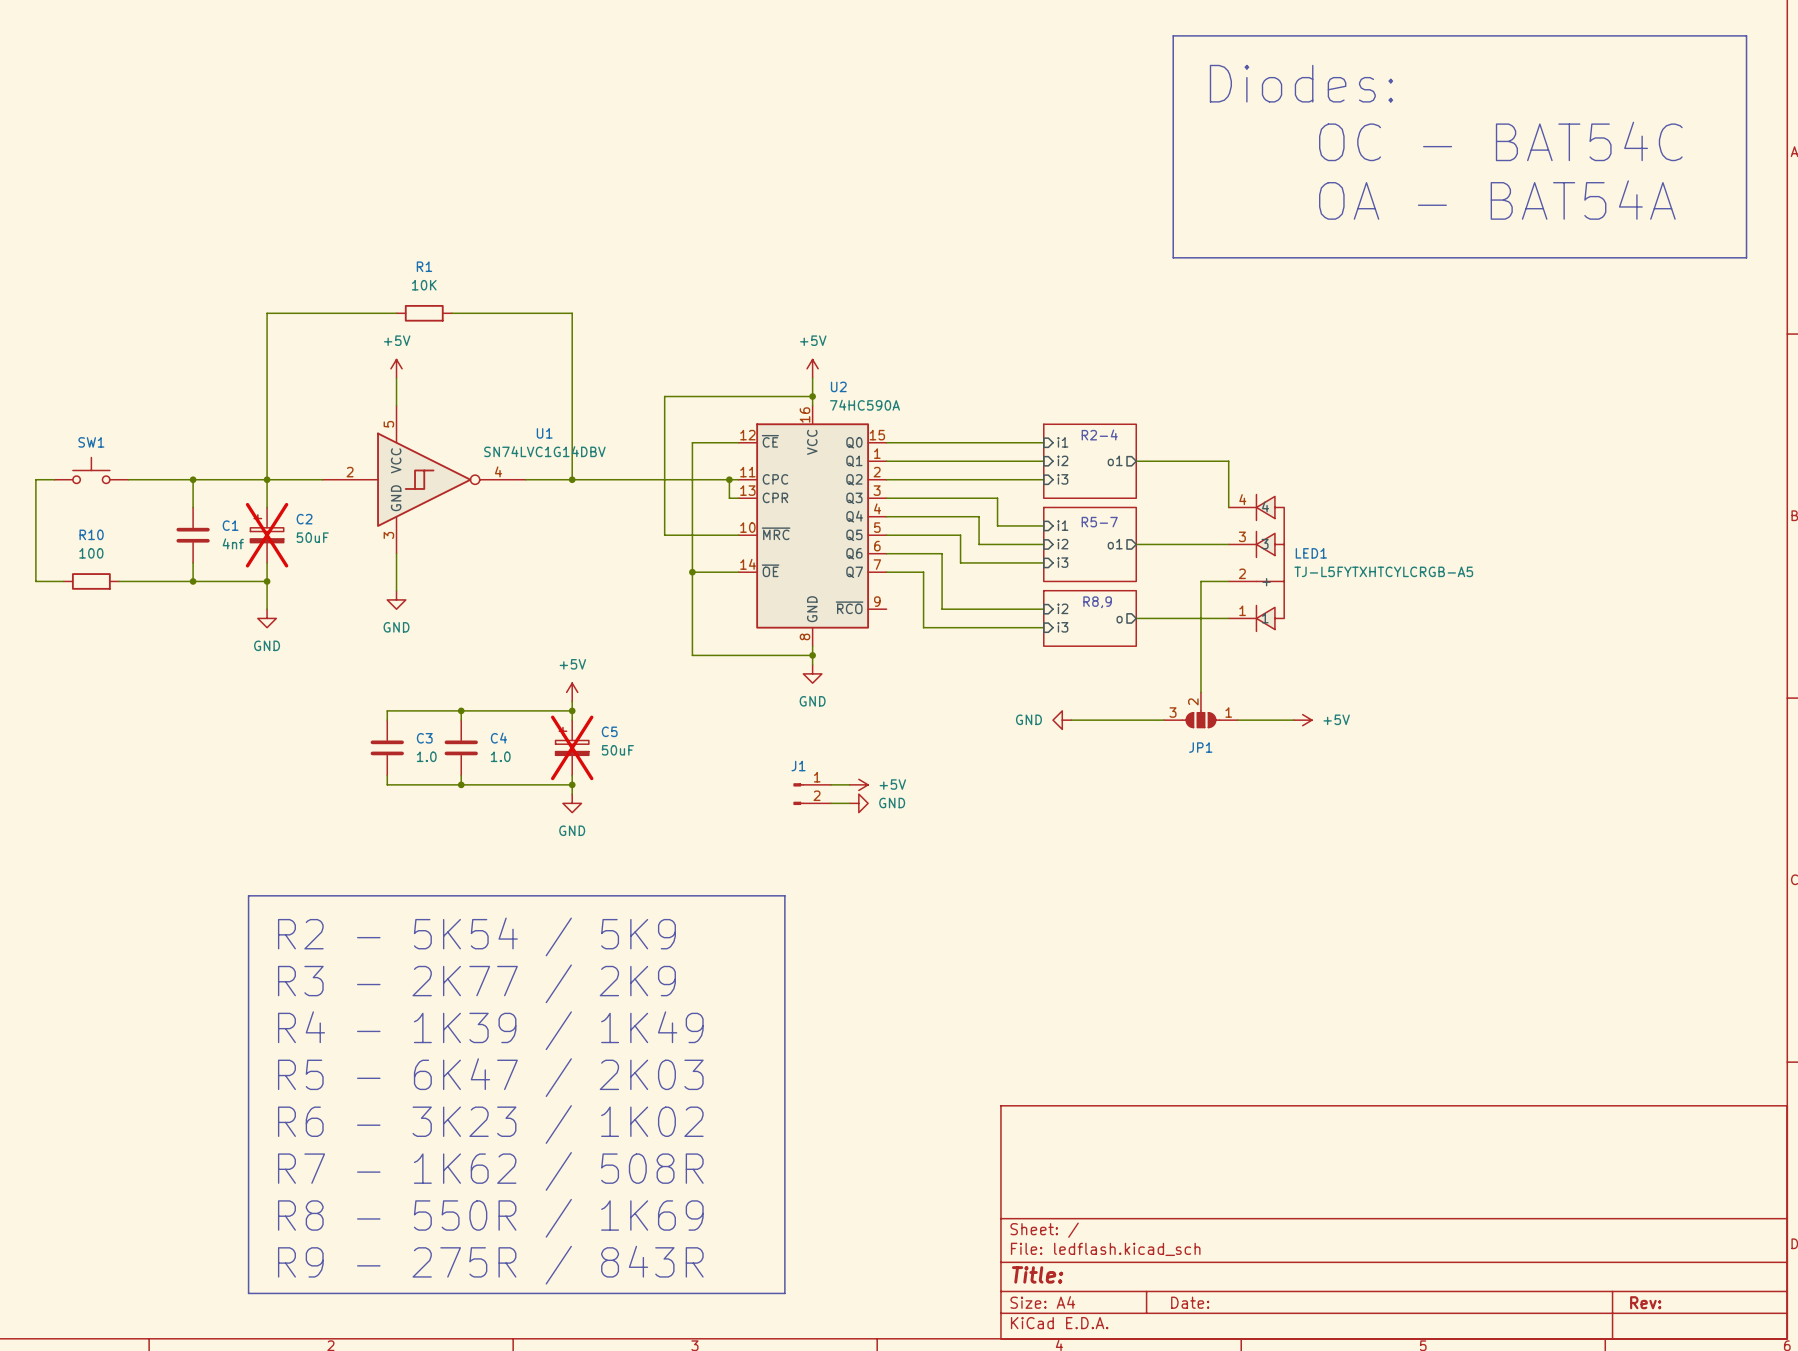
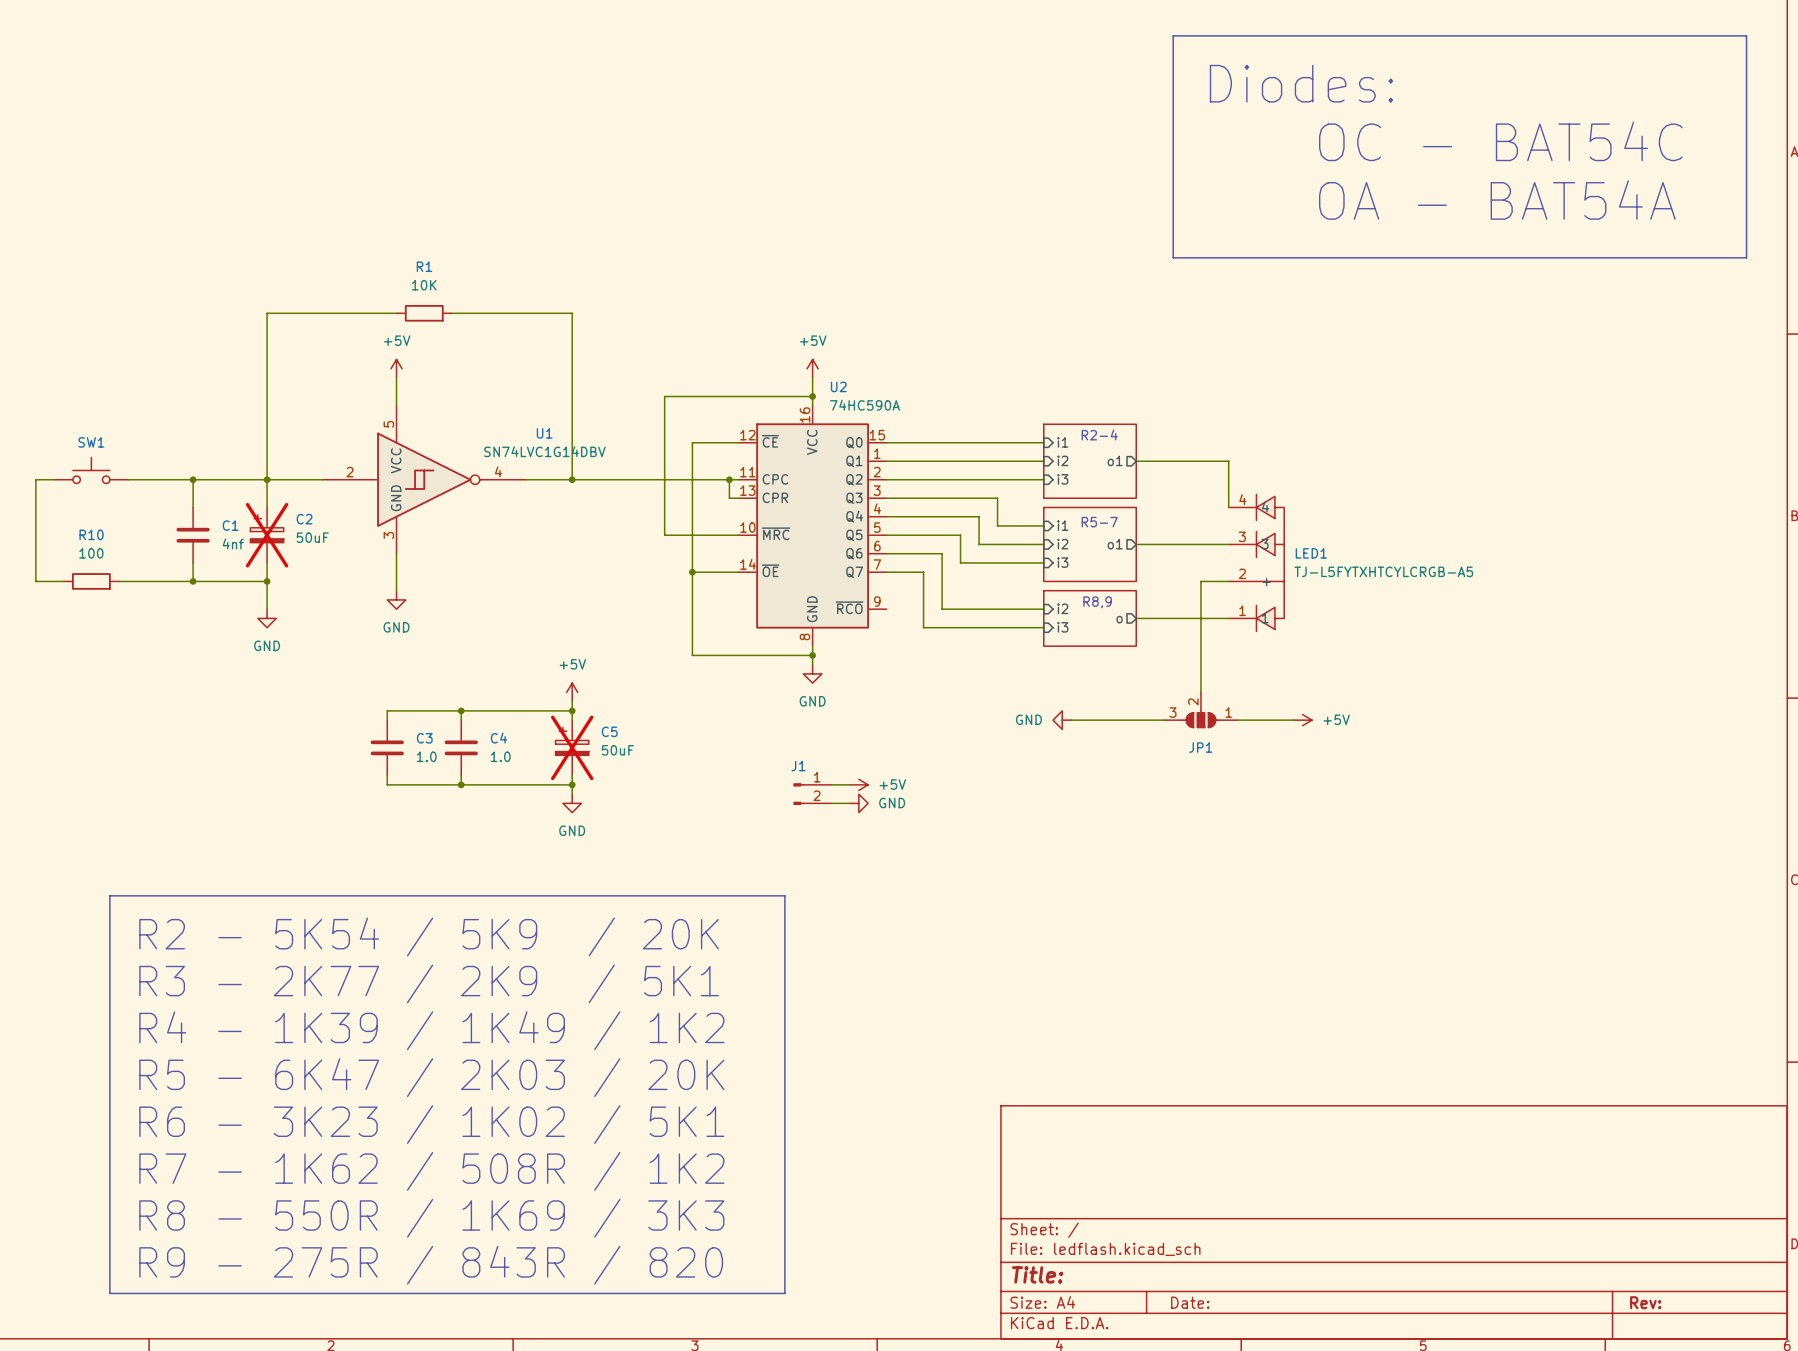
line: (248, 895) (248, 1293) -> (248, 895) (109, 895) (109, 1293) (248, 1293)
text: R2 - 5K54 / 5K9 (476, 936) -> R2 - 5K54 / 5K9 / 20K (429, 936)
text: R3 - 2K77 / 2K9 (476, 983) -> R3 - 2K77 / 2K9 / 5K1 (429, 983)
text: R4 - 1K39 / 1K49 (490, 1030) -> R4 - 1K39 / 1K49 / 1K2 (431, 1030)
text: R5 - 6K47 / 2K03 (490, 1077) -> R5 - 6K47 / 2K03 / 20K (431, 1077)
text: none -> R6 - 3K23 / 1K02 / 5K1 (431, 1124)
text: R6 - 3K23 / 1K02 (490, 1124) -> none
text: none -> R7 - 1K62 / 508R / 1K2 (431, 1171)
text: R7 - 1K62 / 508R (490, 1171) -> none
text: none -> R8 - 550R / 1K69 / 3K3 (431, 1218)
text: R8 - 550R / 1K69 (490, 1218) -> none
text: R9 - 275R / 843R (490, 1265) -> R9 - 275R / 843R / 820 (431, 1265)

